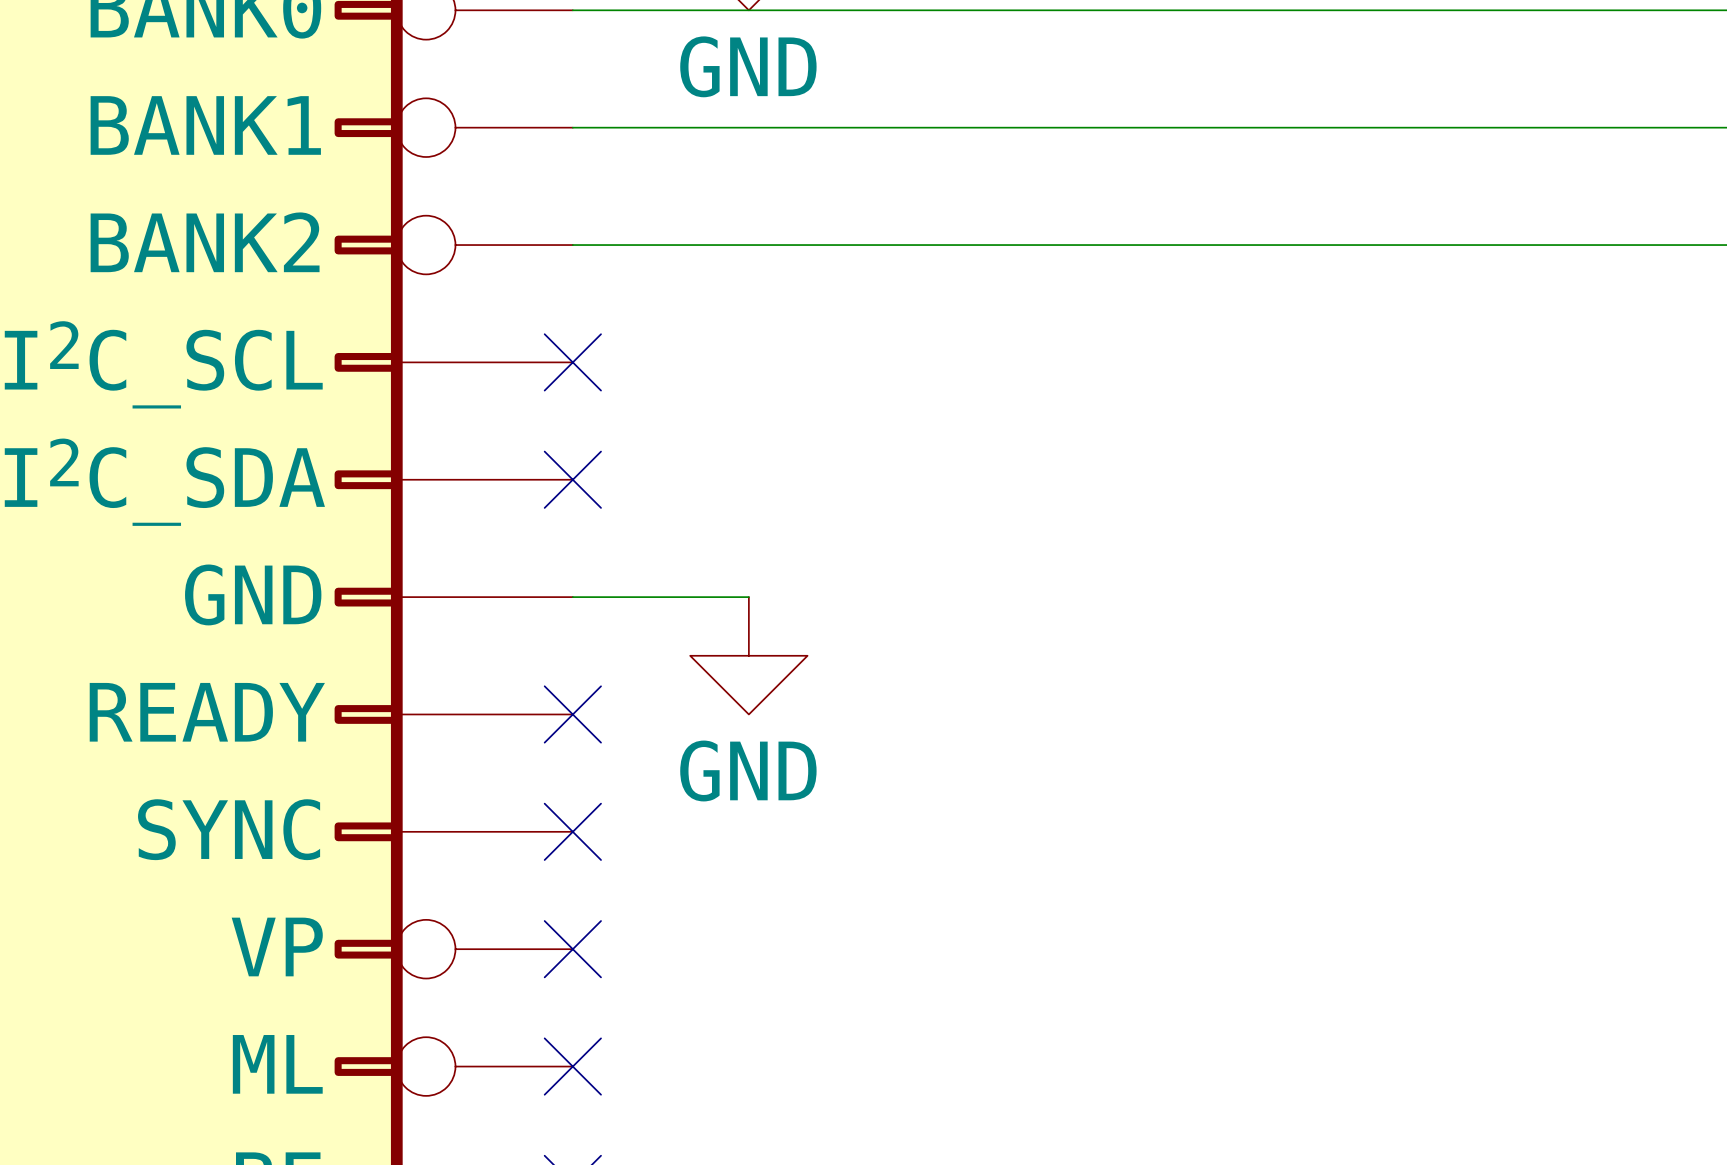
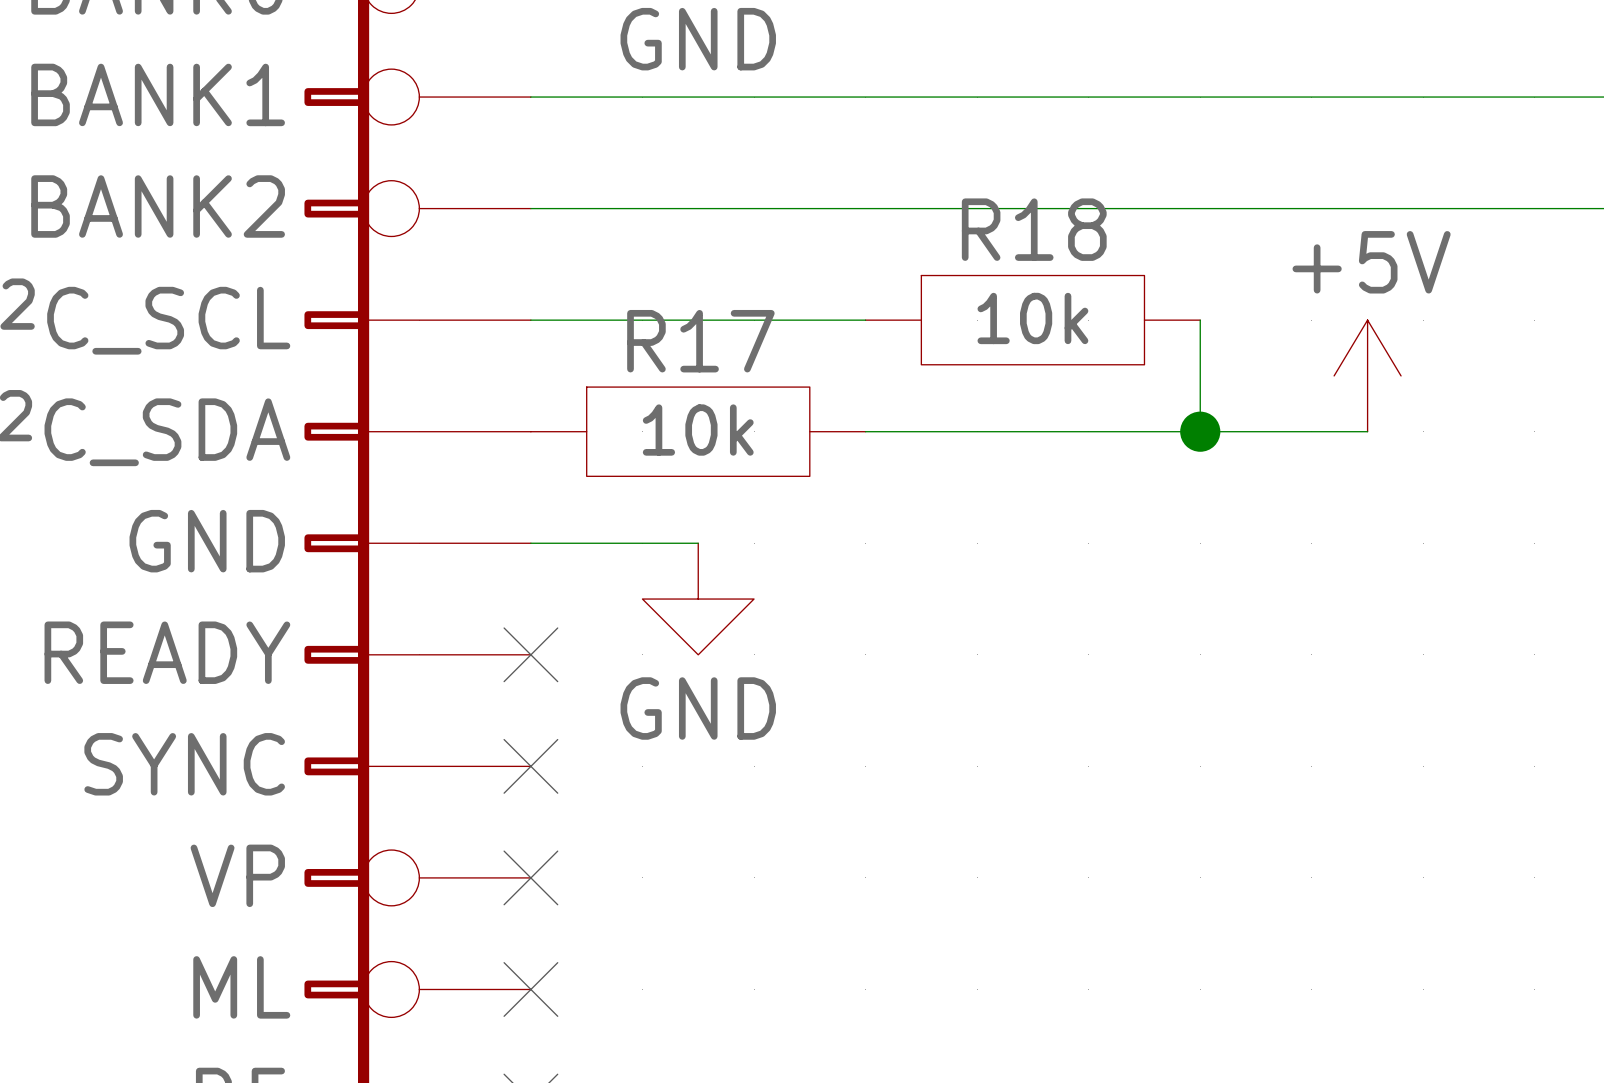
wire: none -> (530, 320) (865, 320)
no-connect mark: (572, 362) -> none
R18: none -> 10k (1032, 320)
wire: none -> (1200, 320) (1200, 431)
power symbol: none -> +5V (1367, 375)
no-connect mark: (572, 479) -> none
R17: none -> 10k (698, 431)
wire: none -> (865, 431) (1367, 431)
junction: none -> (1200, 431)

